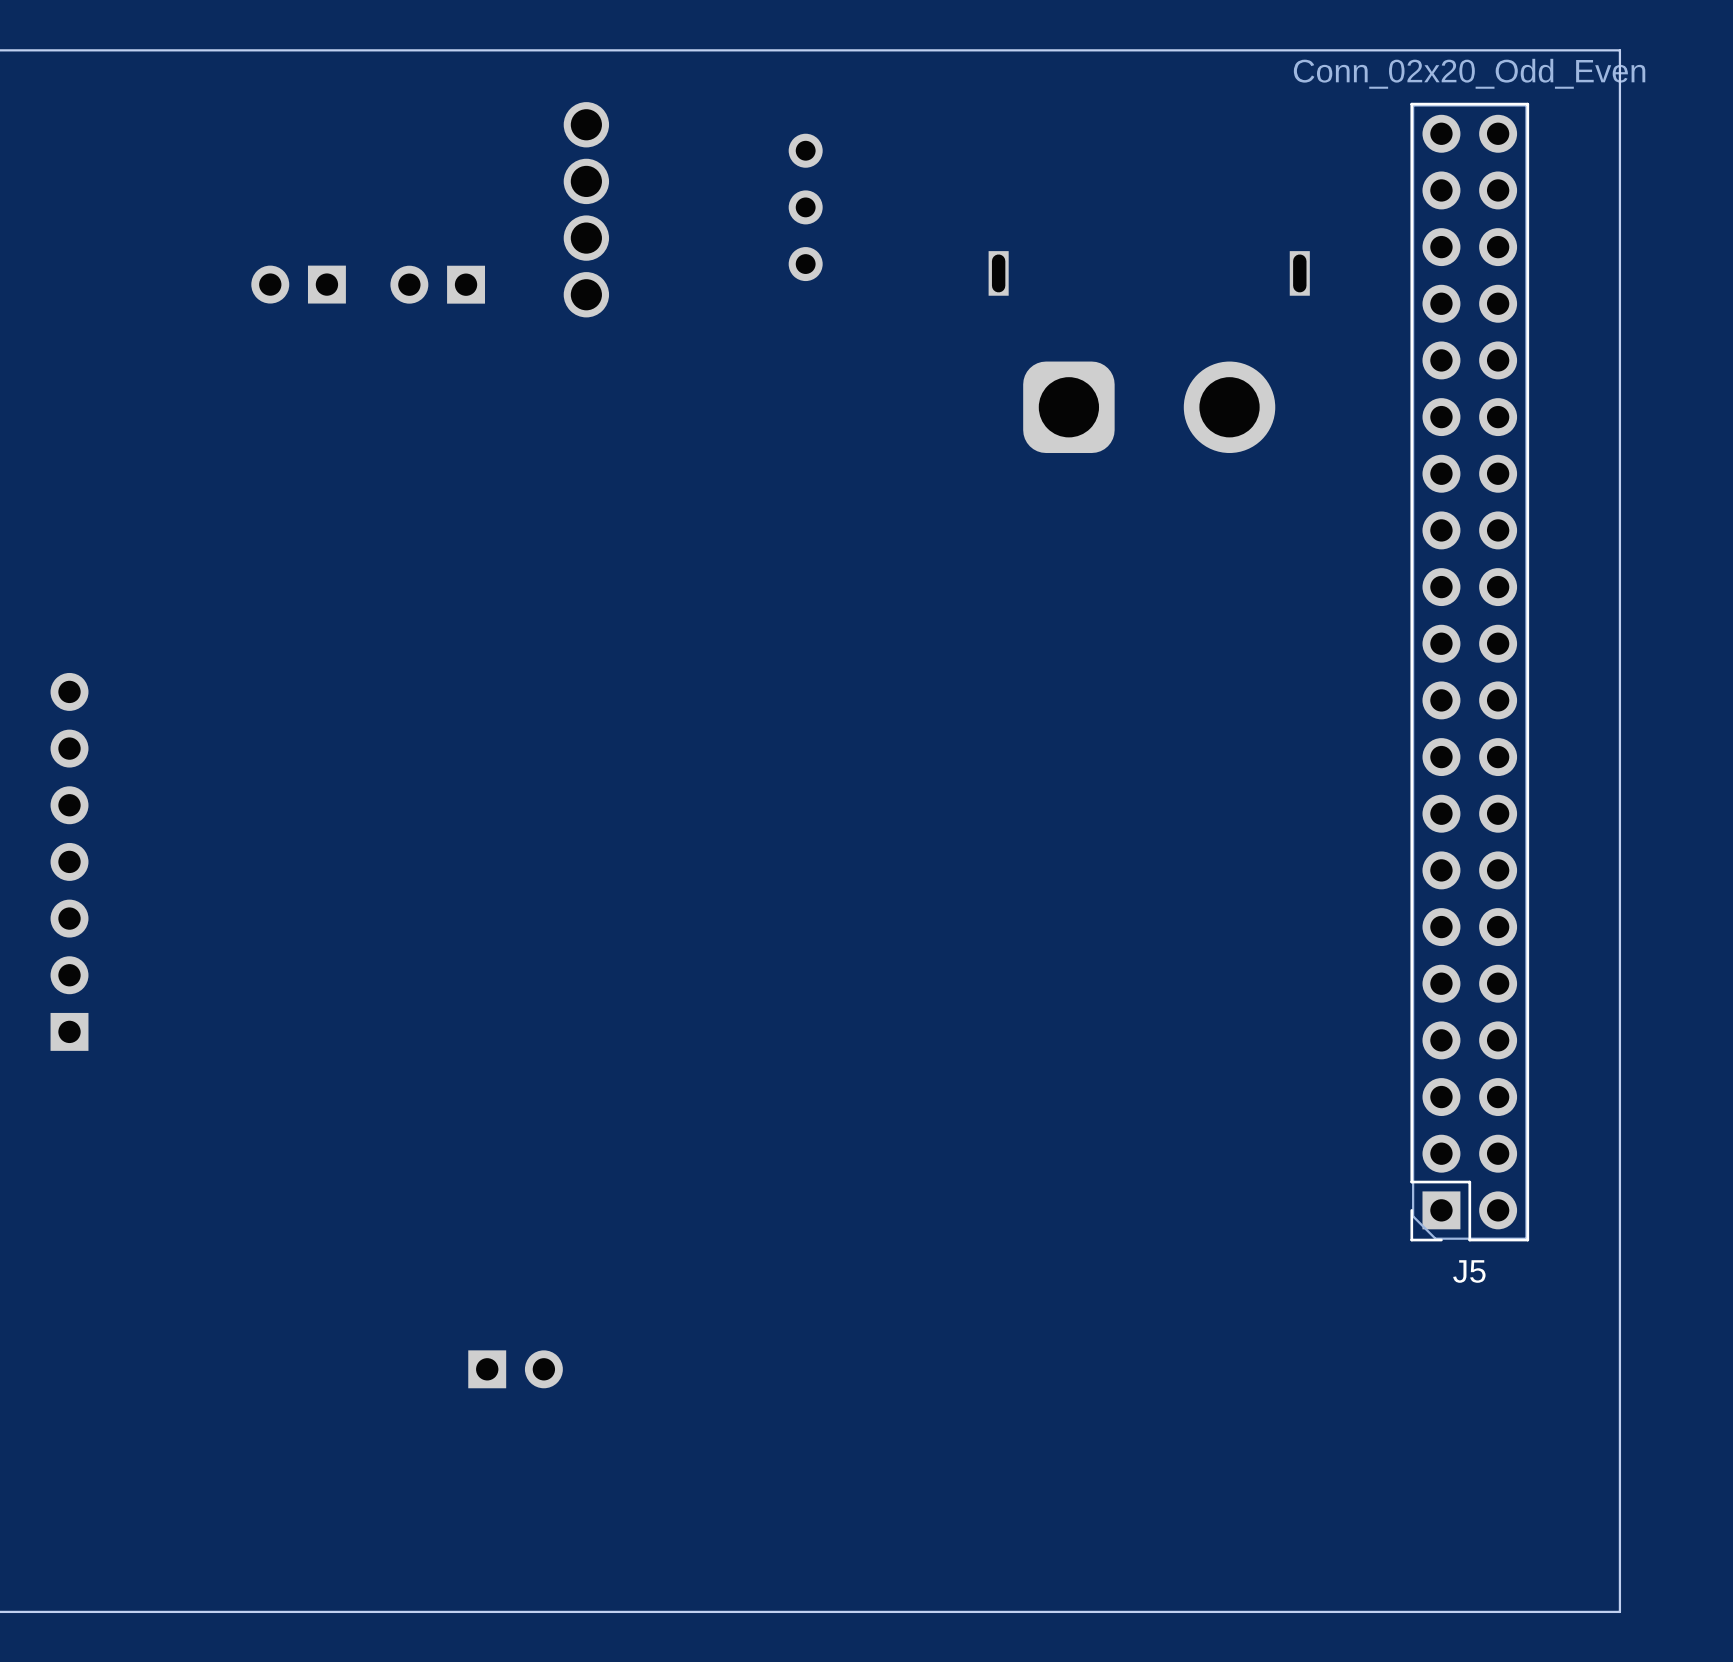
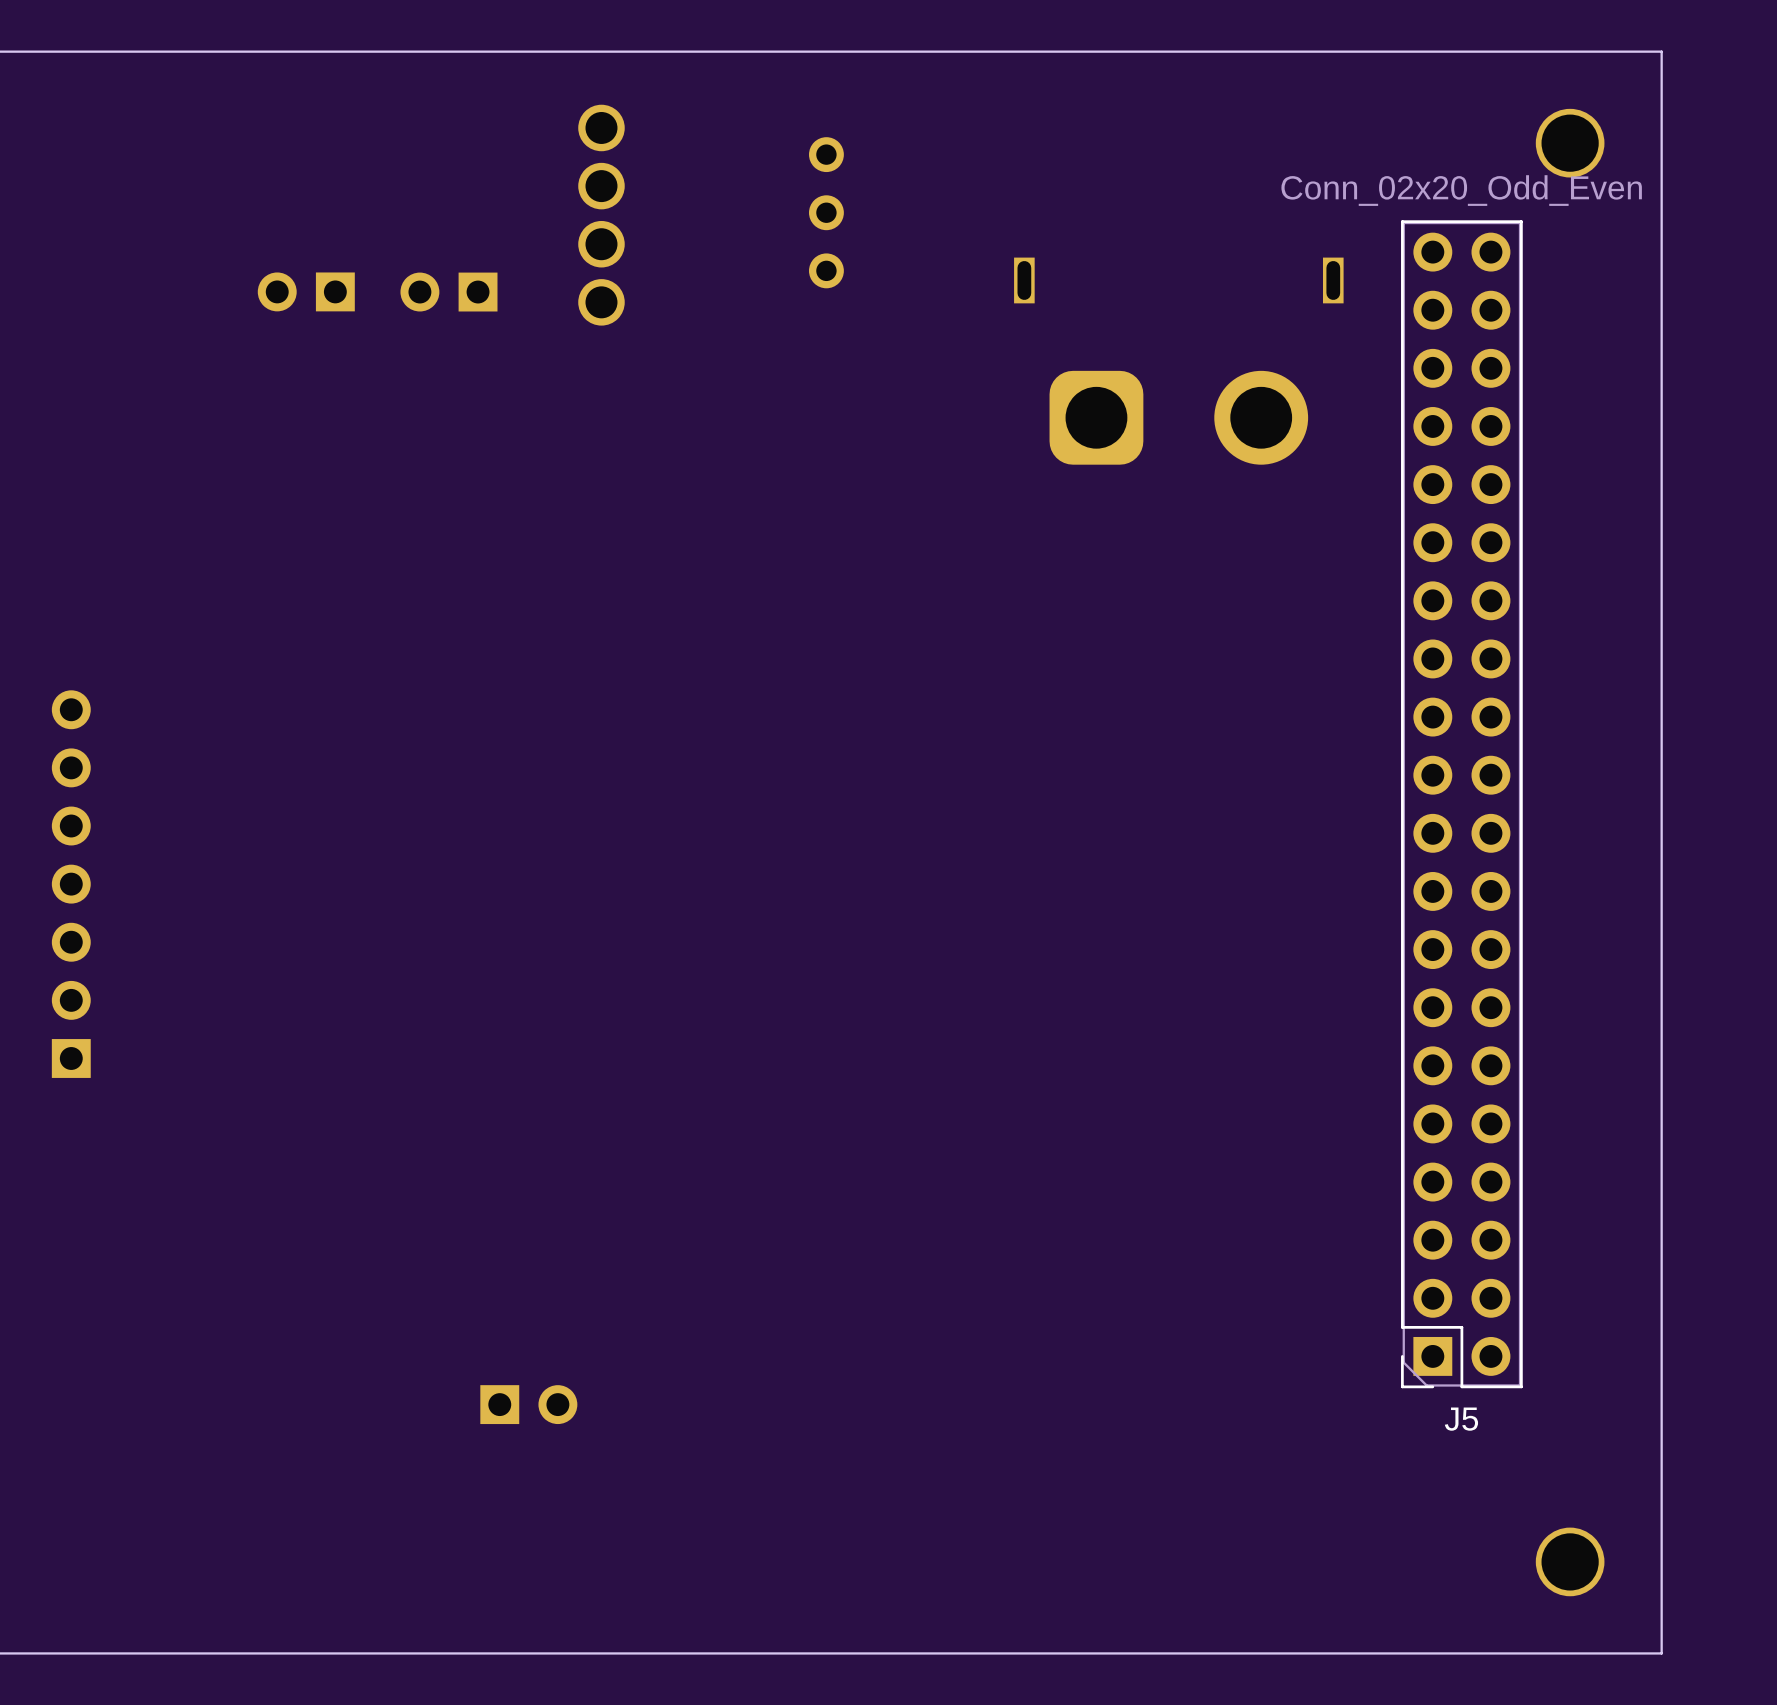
part: none -> (1570, 143)
J5 position: (1469, 672) -> (1461, 804)
part: none -> (1570, 1561)

